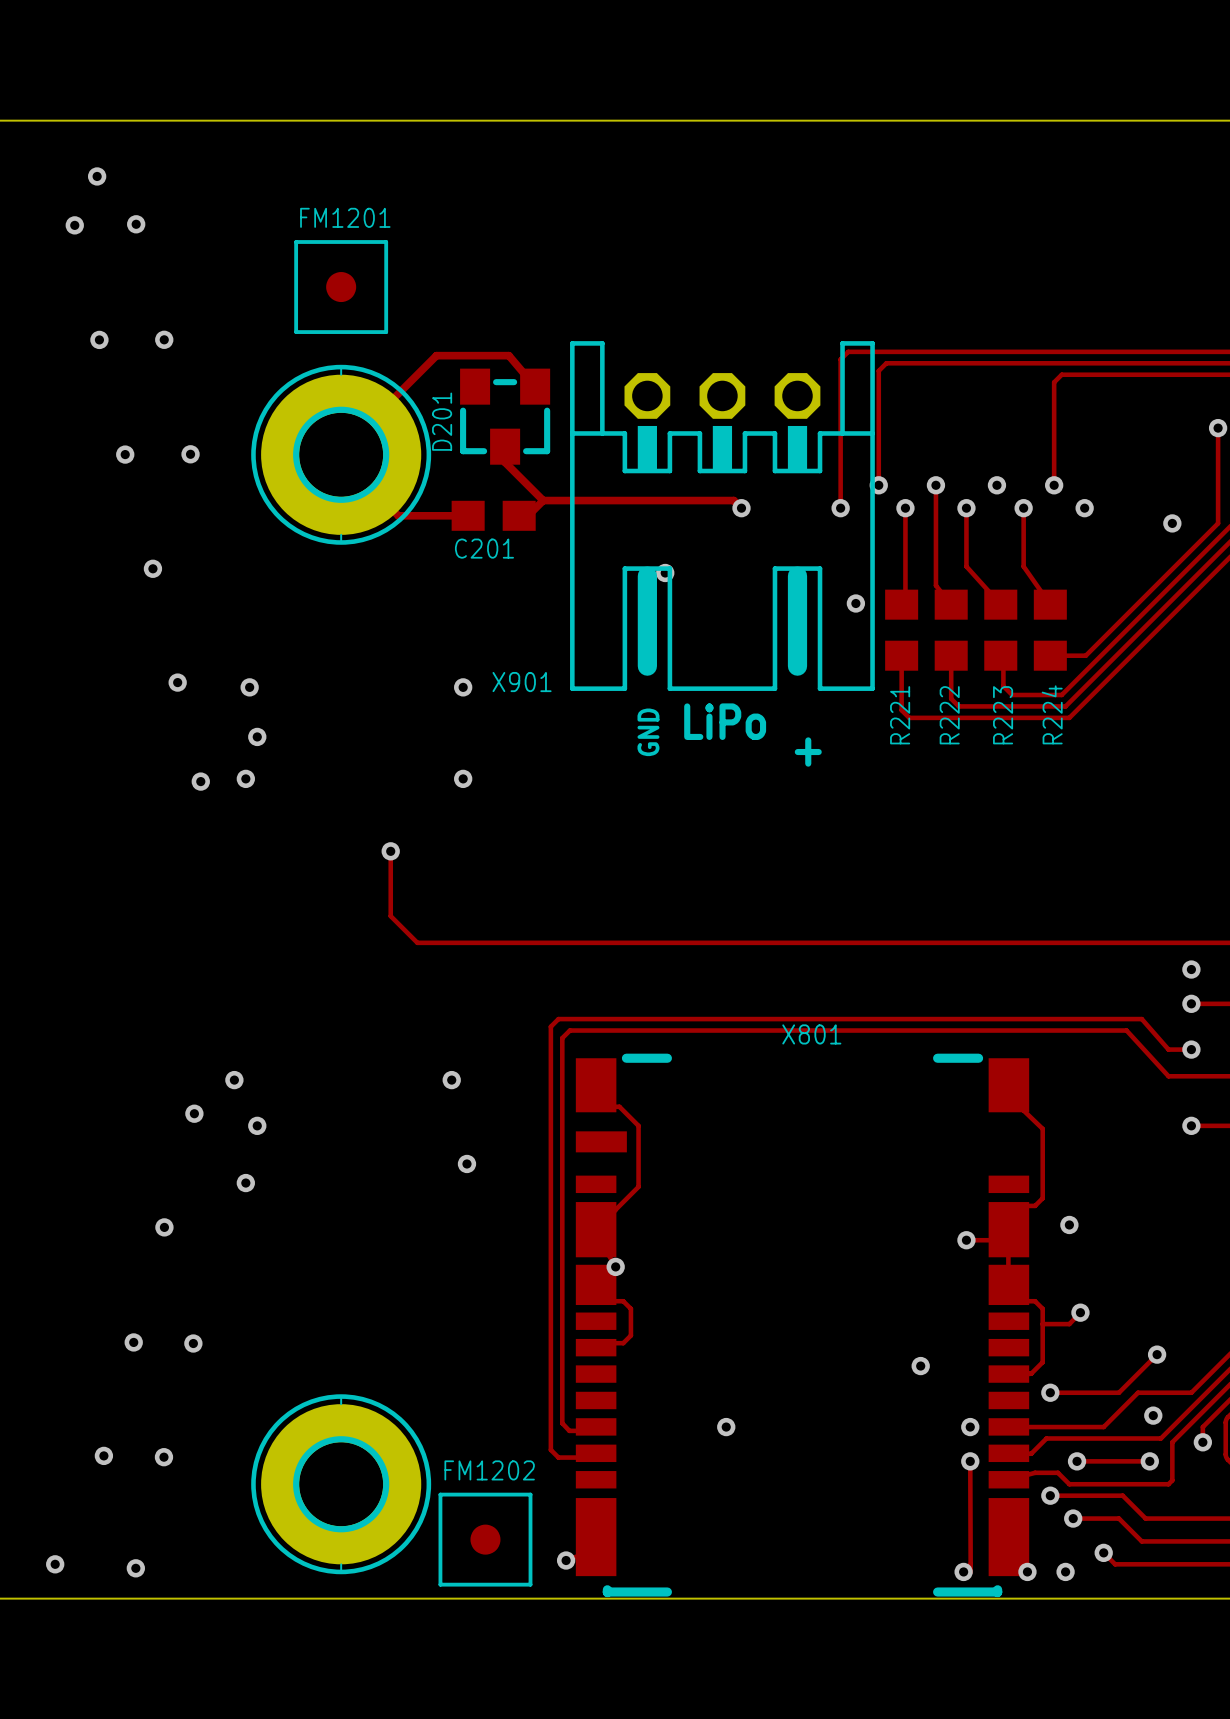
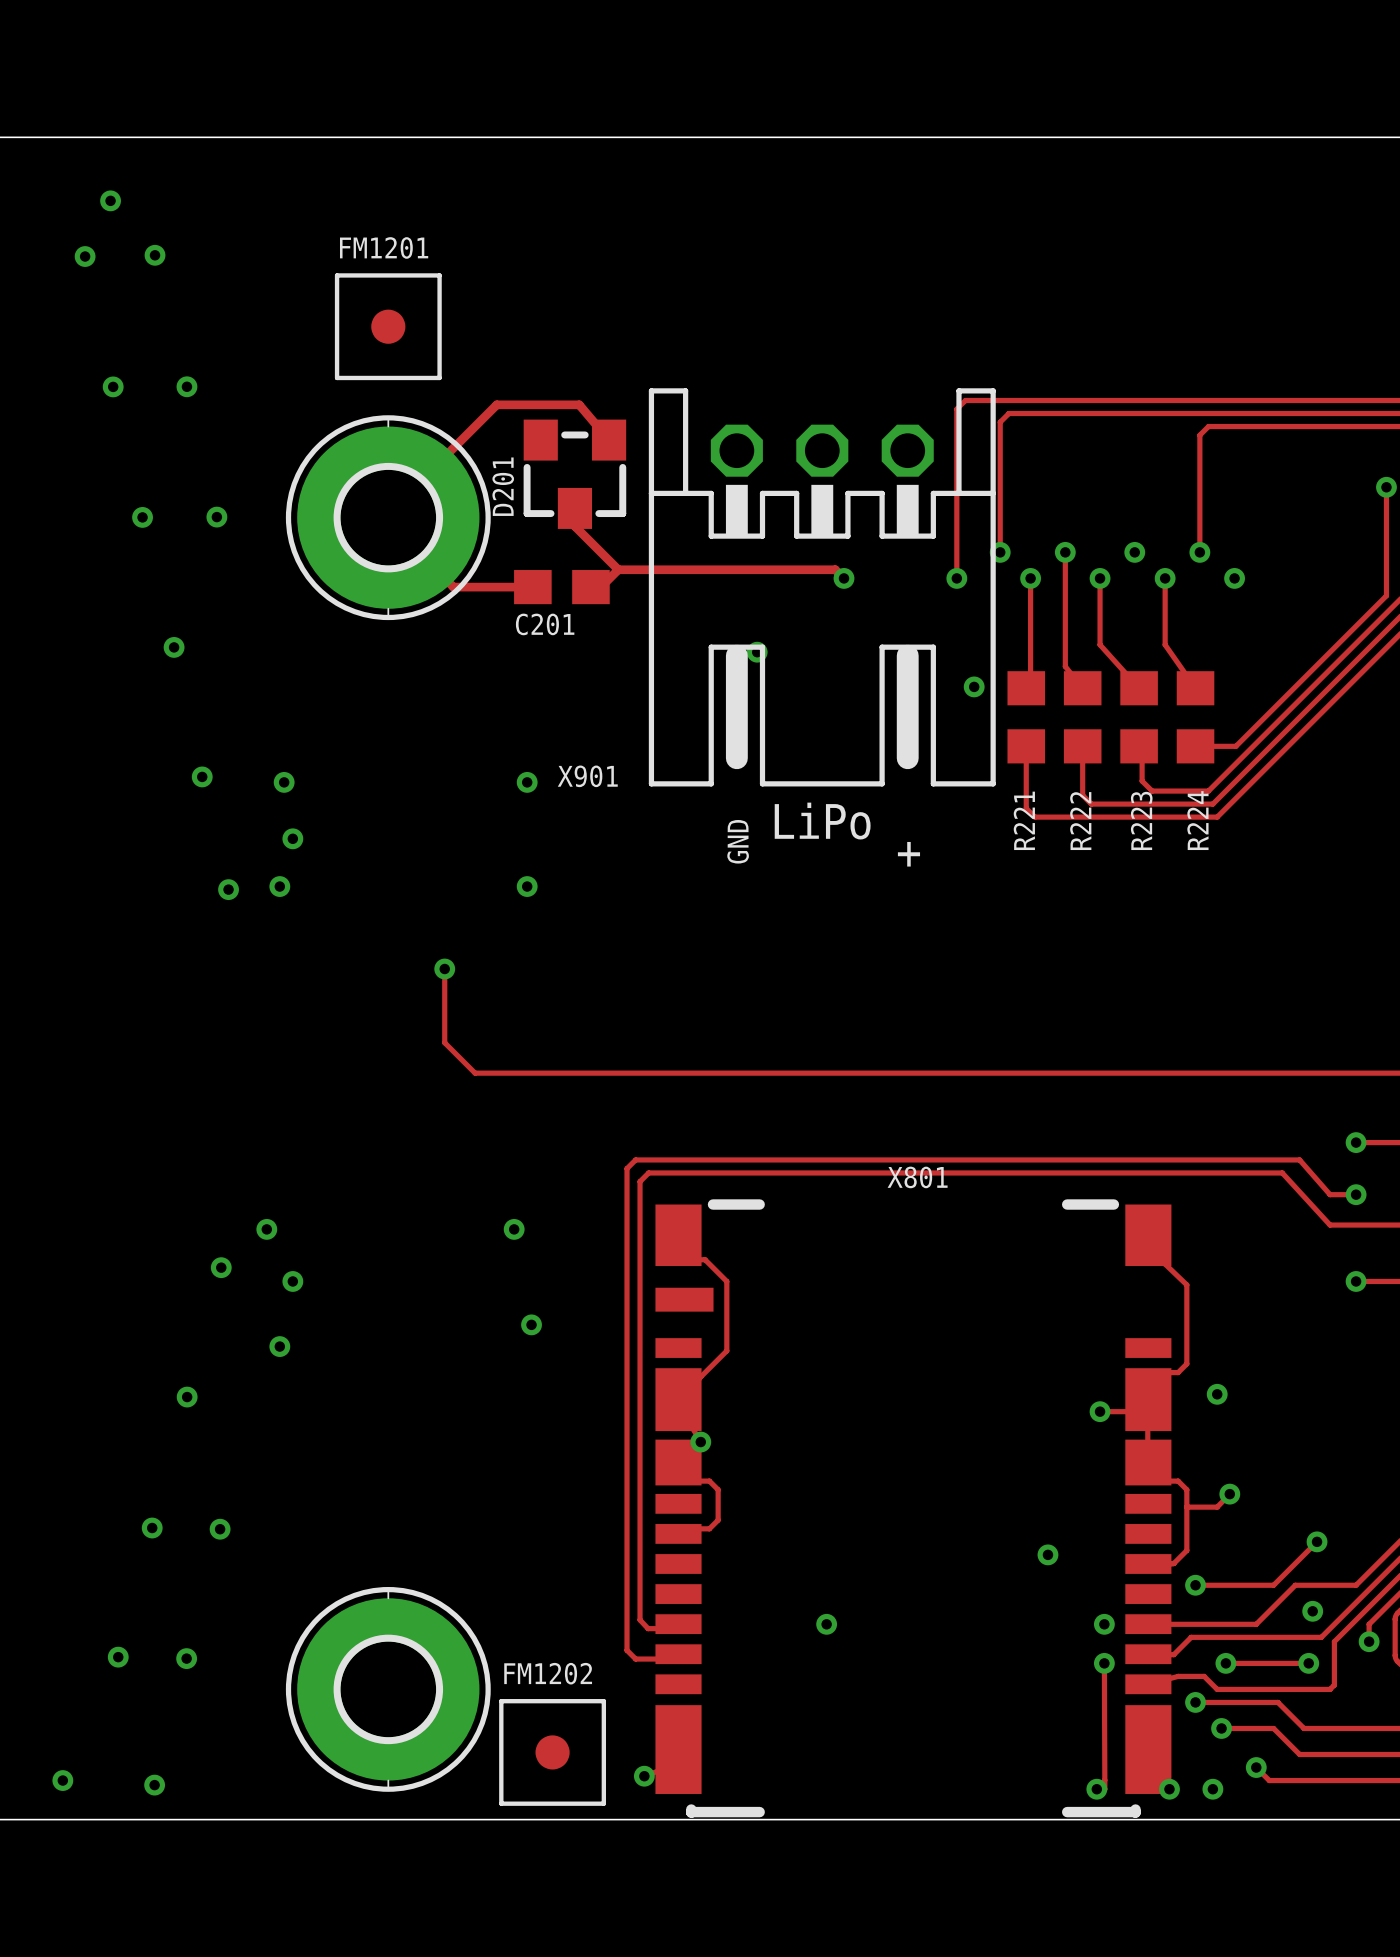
via: (1172, 523) -> none
via: (1191, 969) -> none

